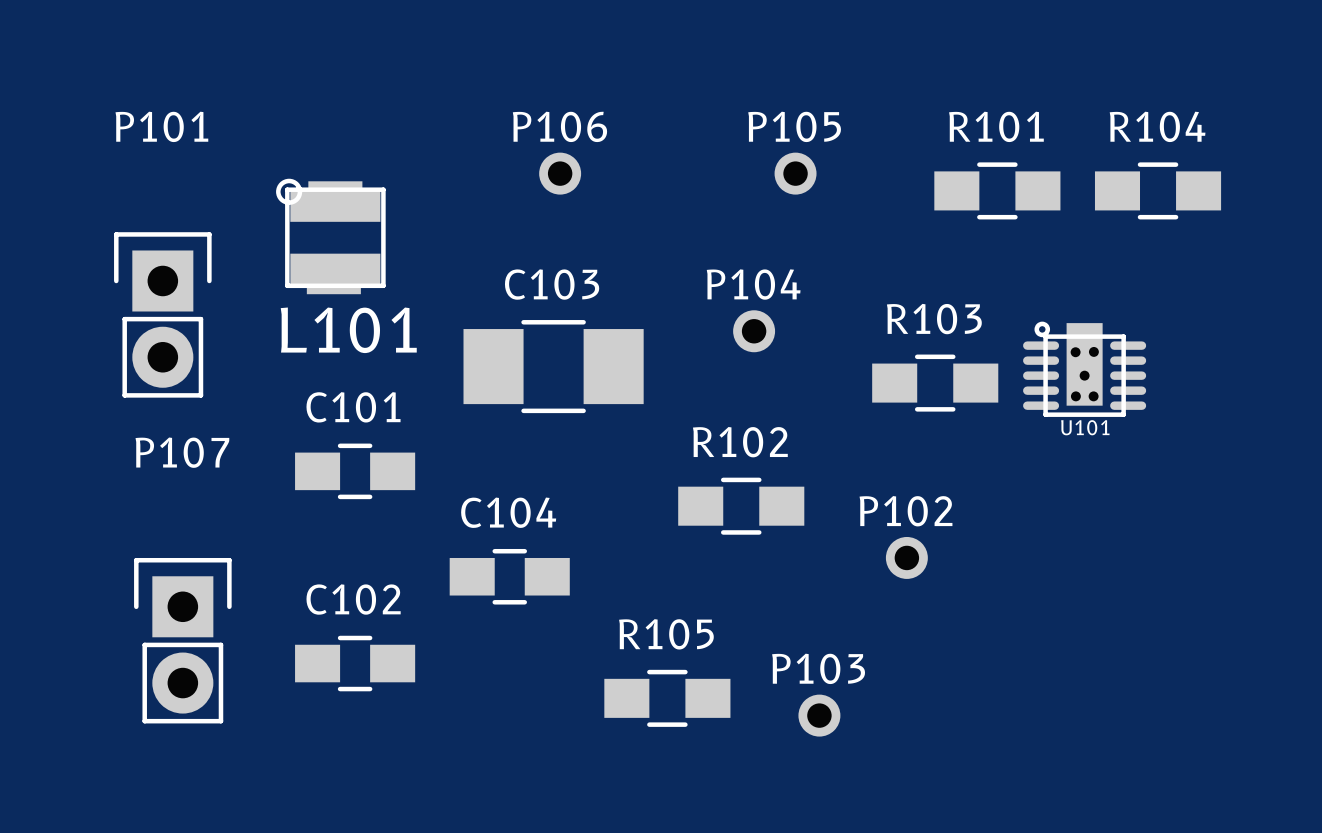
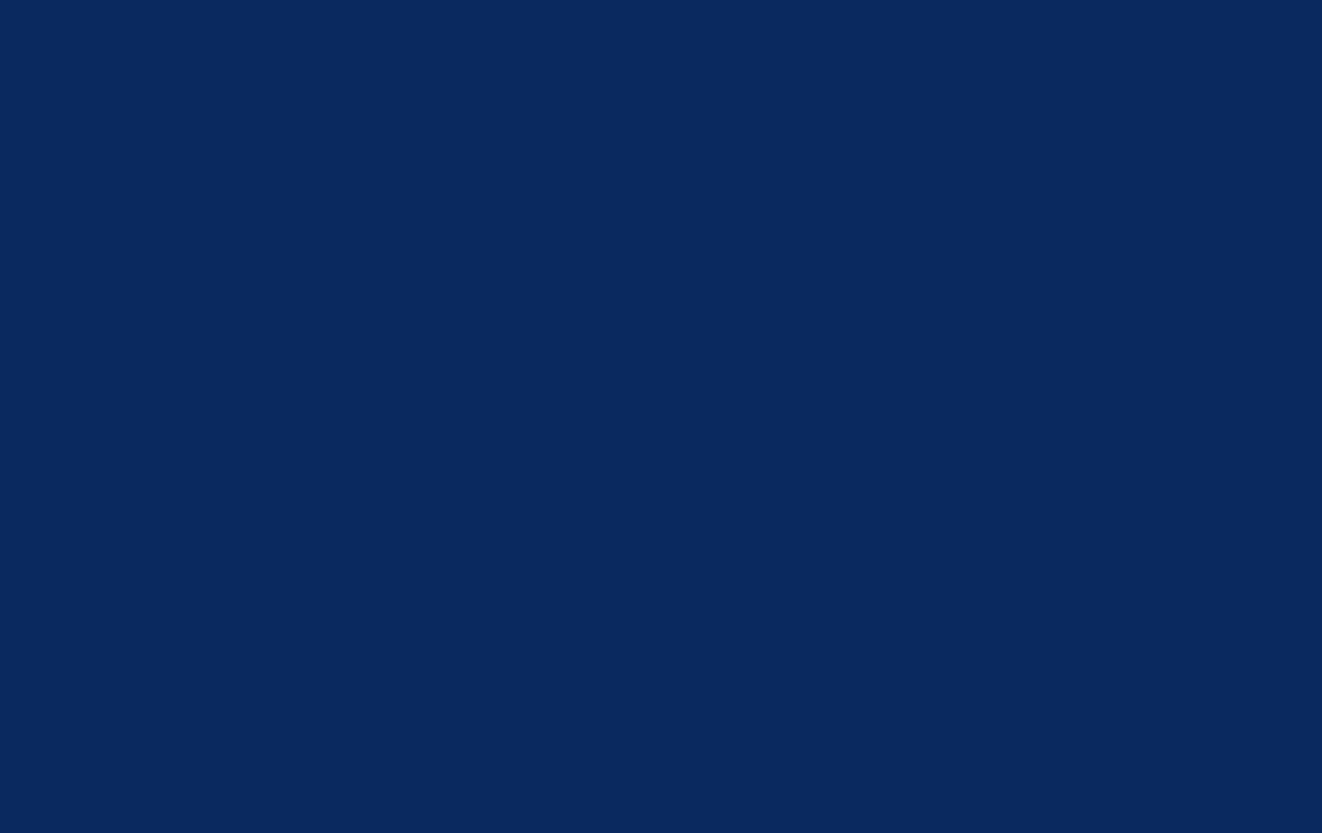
P106: (560, 173) -> none
P105: (795, 173) -> none
R101: (997, 190) -> none
R104: (1158, 190) -> none
L101: (330, 236) -> none
P101: (162, 314) -> none
P104: (754, 331) -> none
C103: (553, 366) -> none
U101: (1084, 369) -> none
R103: (935, 383) -> none
C101: (355, 471) -> none
R102: (741, 506) -> none
P102: (906, 557) -> none
C104: (509, 576) -> none
P107: (182, 640) -> none
C102: (355, 663) -> none
R105: (667, 698) -> none
P103: (819, 715) -> none

